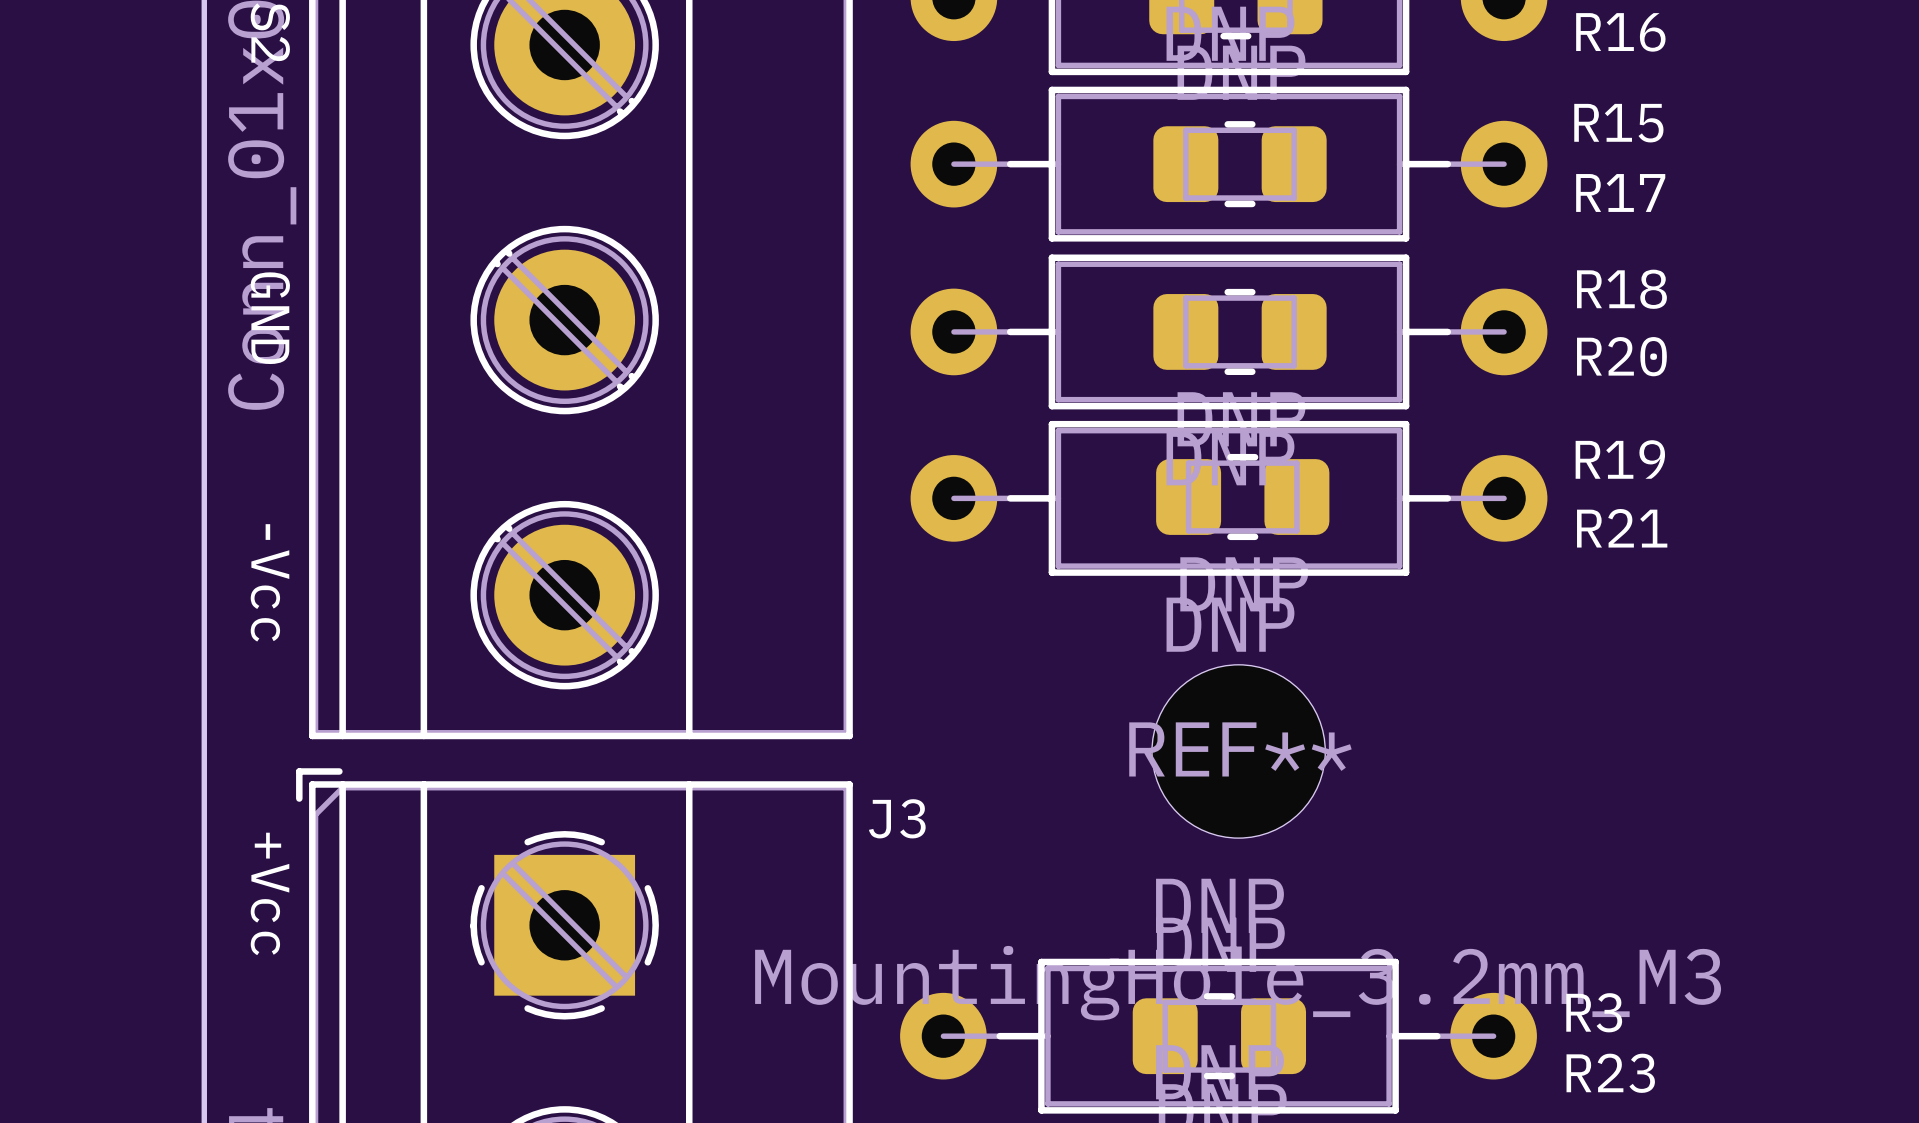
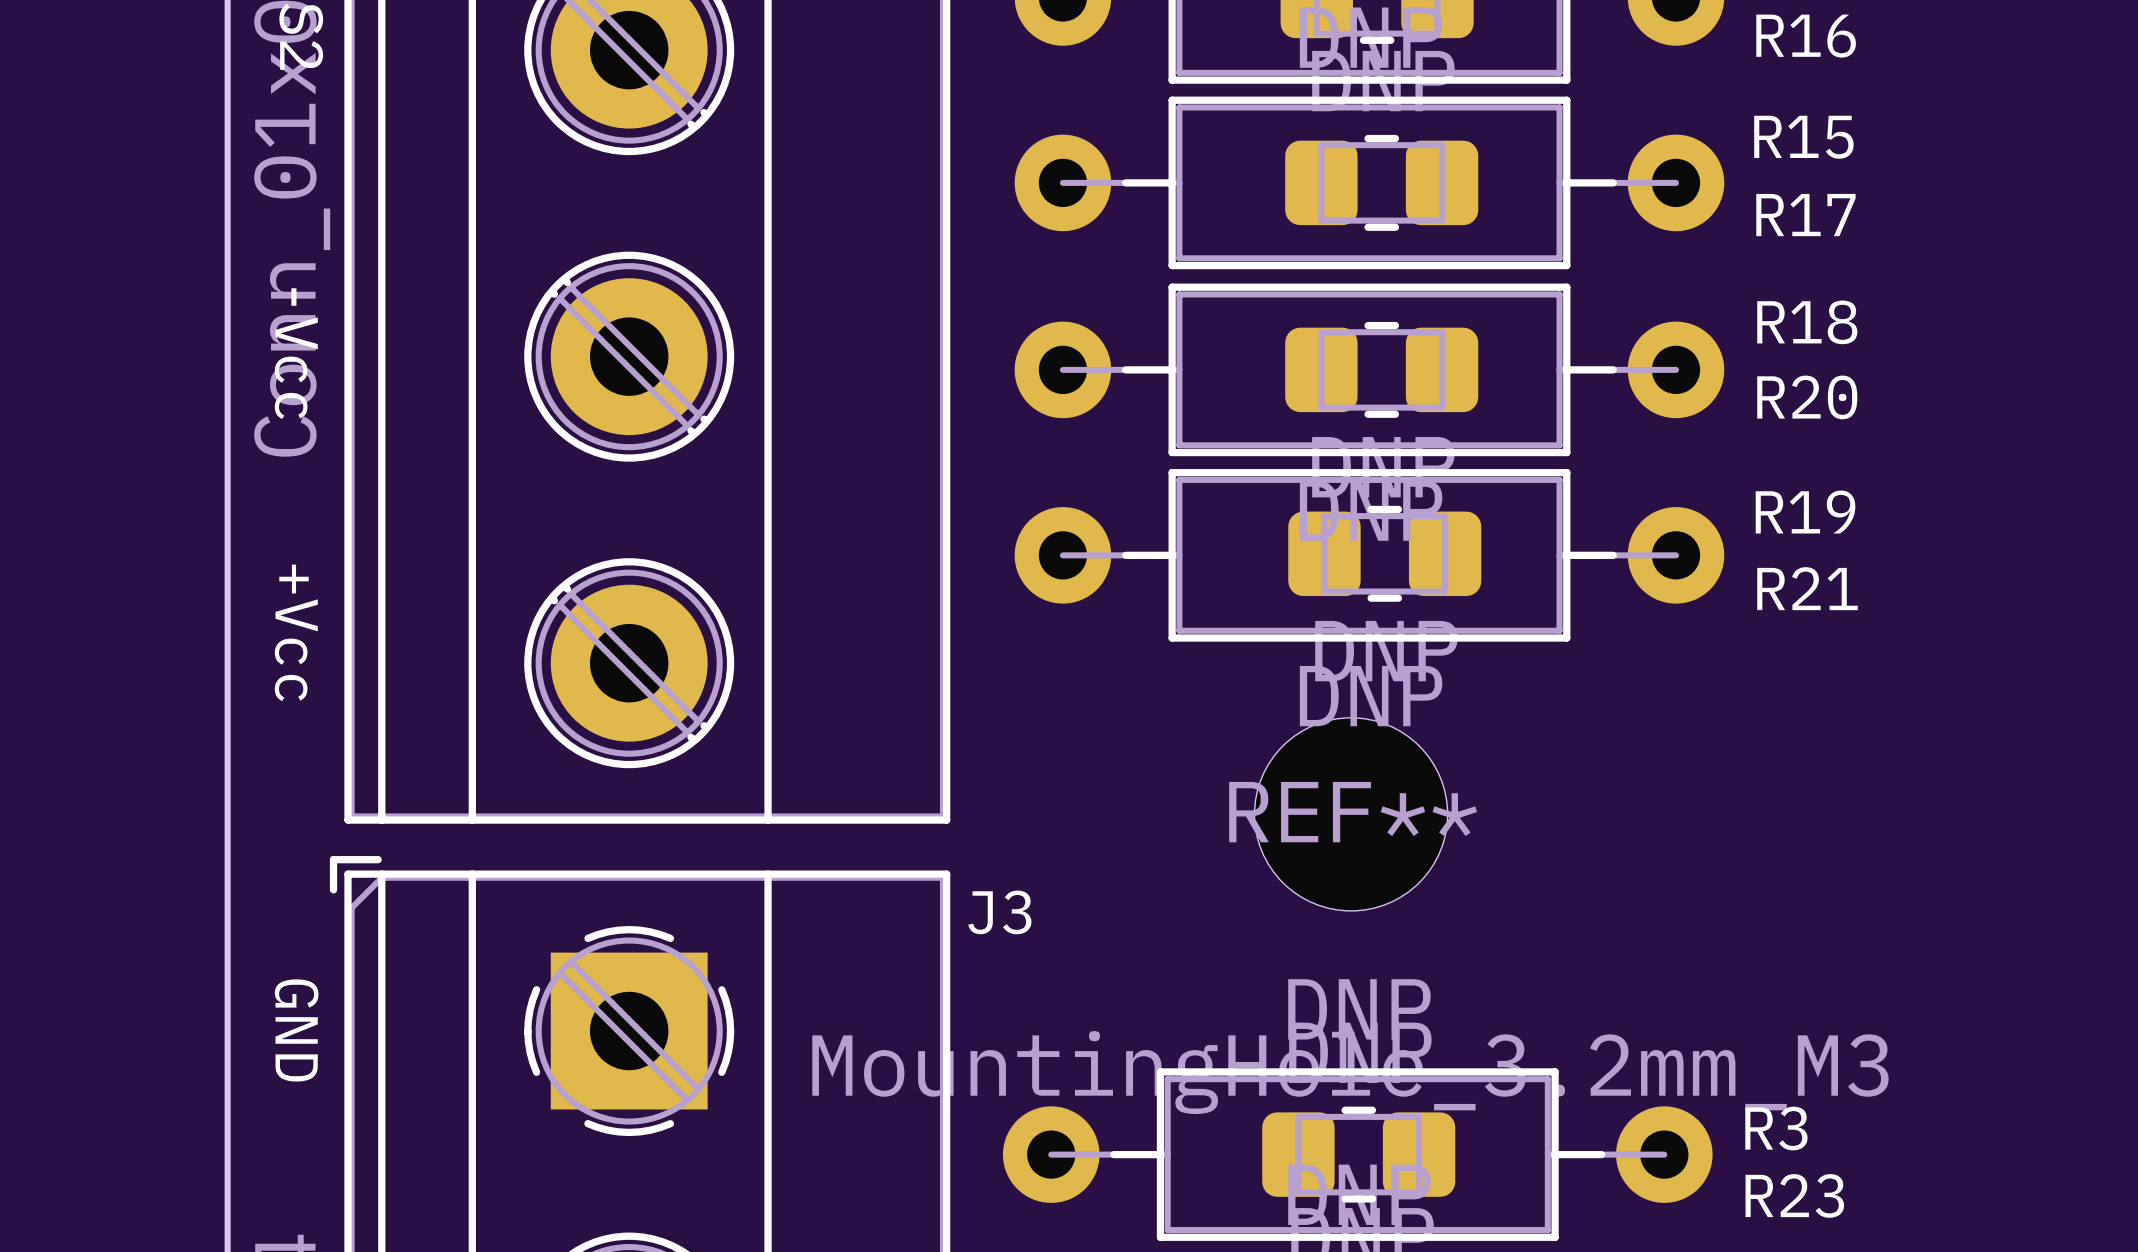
text: GND (270, 318) -> -Vcc (296, 353)
text: -Vcc (270, 582) -> +Vcc (296, 632)
REF** position: (1238, 751) -> (1351, 814)
text: +Vcc (270, 893) -> GND (296, 1030)

